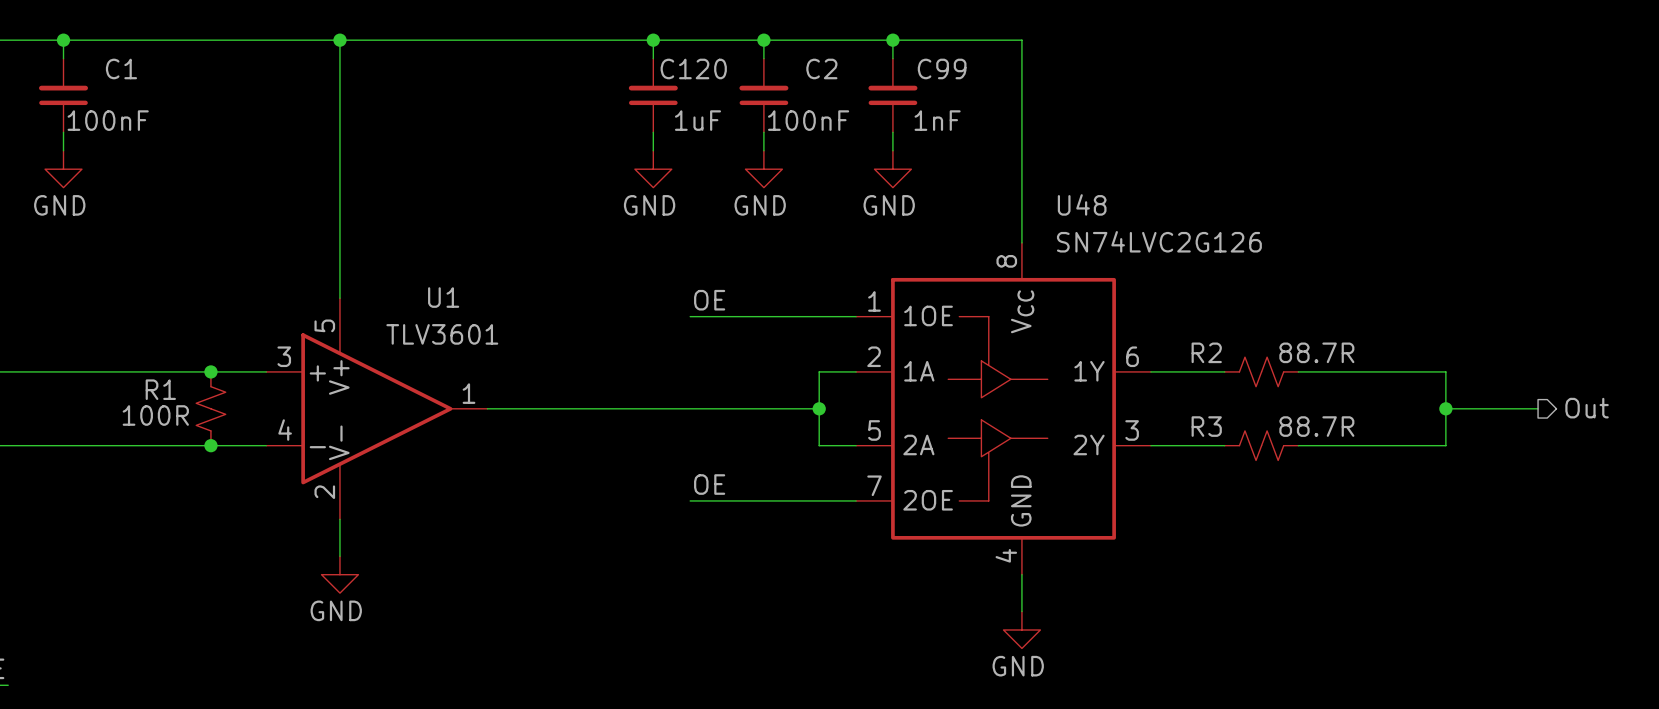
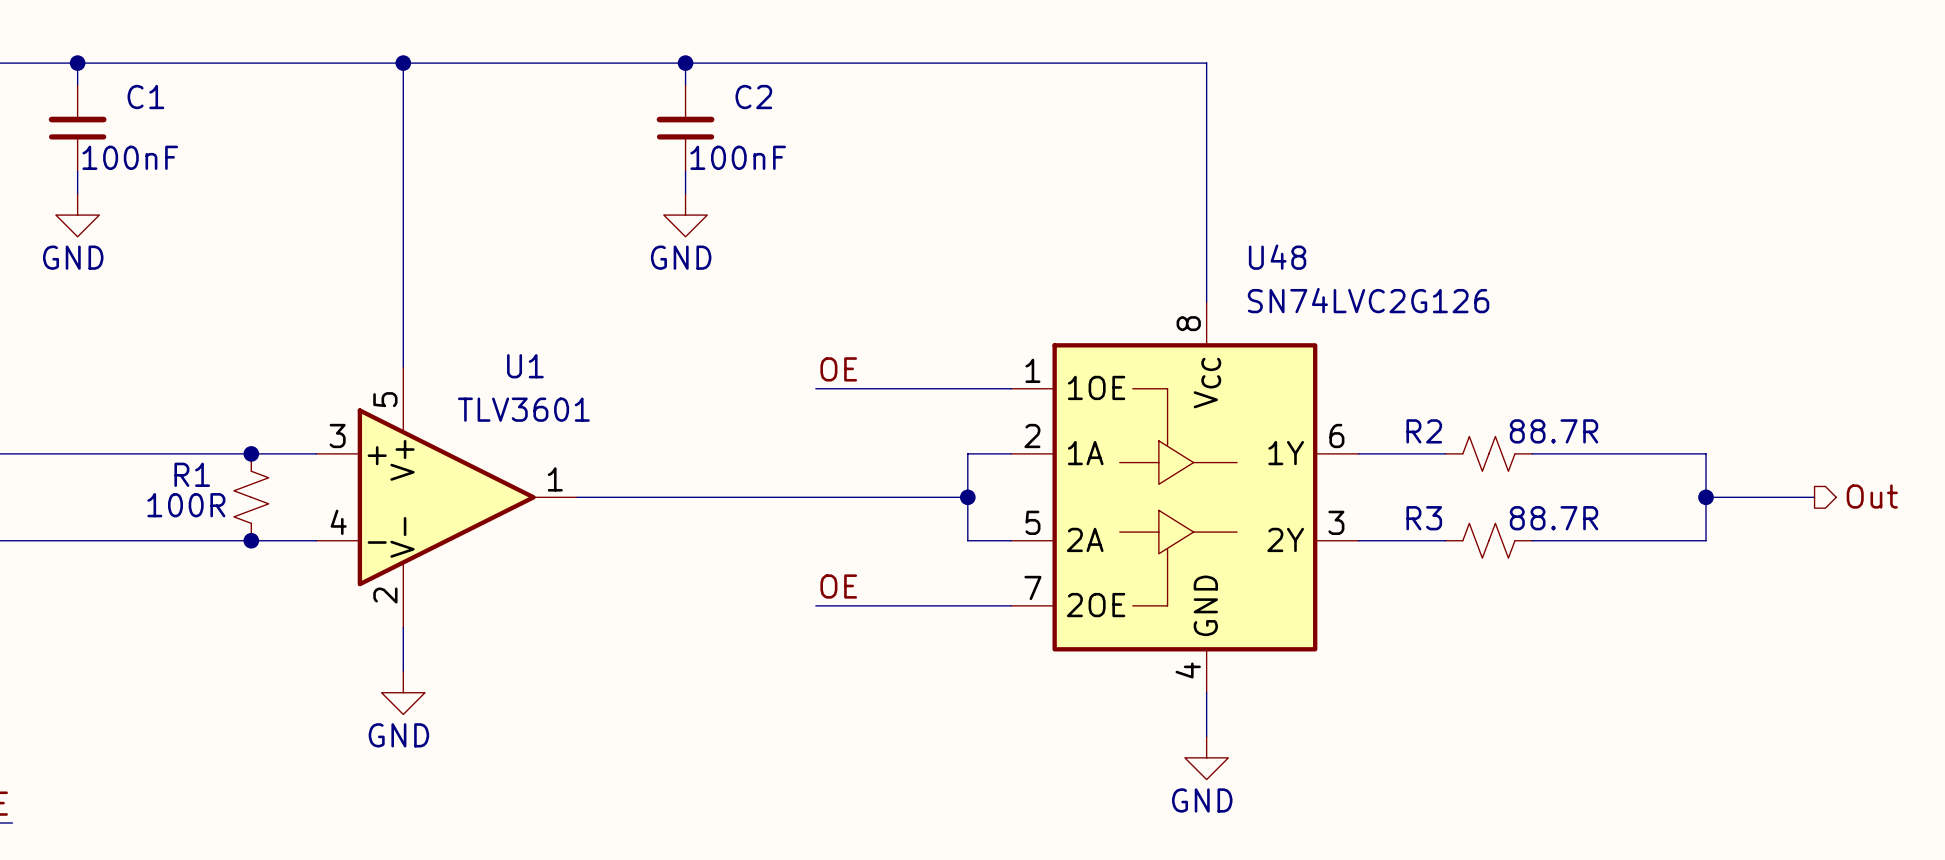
wire: (653, 40) (653, 58) -> (685, 63) (685, 84)
junction position: (653, 40) -> (685, 63)
wire: (763, 40) (763, 58) -> none
junction: (763, 40) -> none
wire: (892, 40) (892, 58) -> none
junction: (892, 40) -> none
C120: 1uF (653, 95) -> none
C2 position: (763, 95) -> (685, 128)
C99: 1nF (892, 95) -> none
wire: (653, 132) (653, 150) -> (685, 171) (685, 193)
wire: (763, 132) (763, 150) -> none
wire: (892, 132) (892, 150) -> none
power symbol position: GND (653, 169) -> GND (685, 215)
power symbol: GND (763, 169) -> none
power symbol: GND (892, 169) -> none

